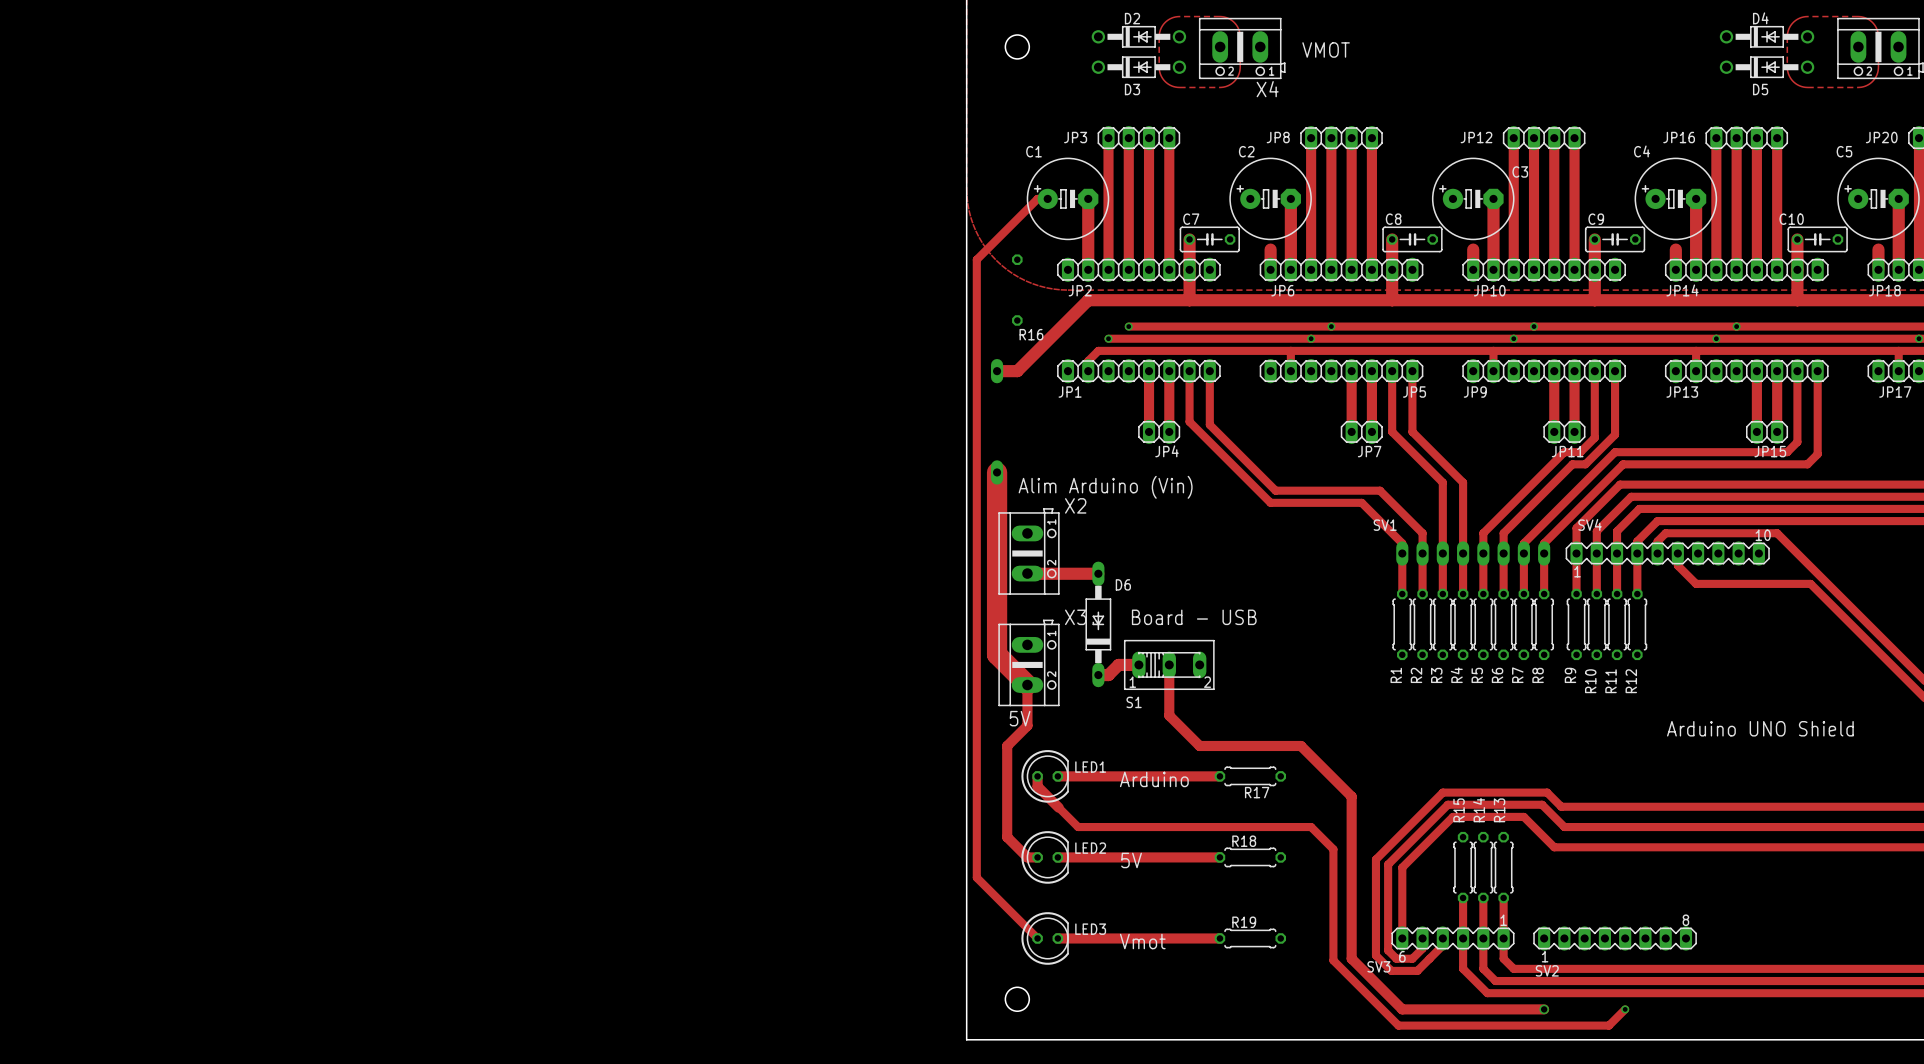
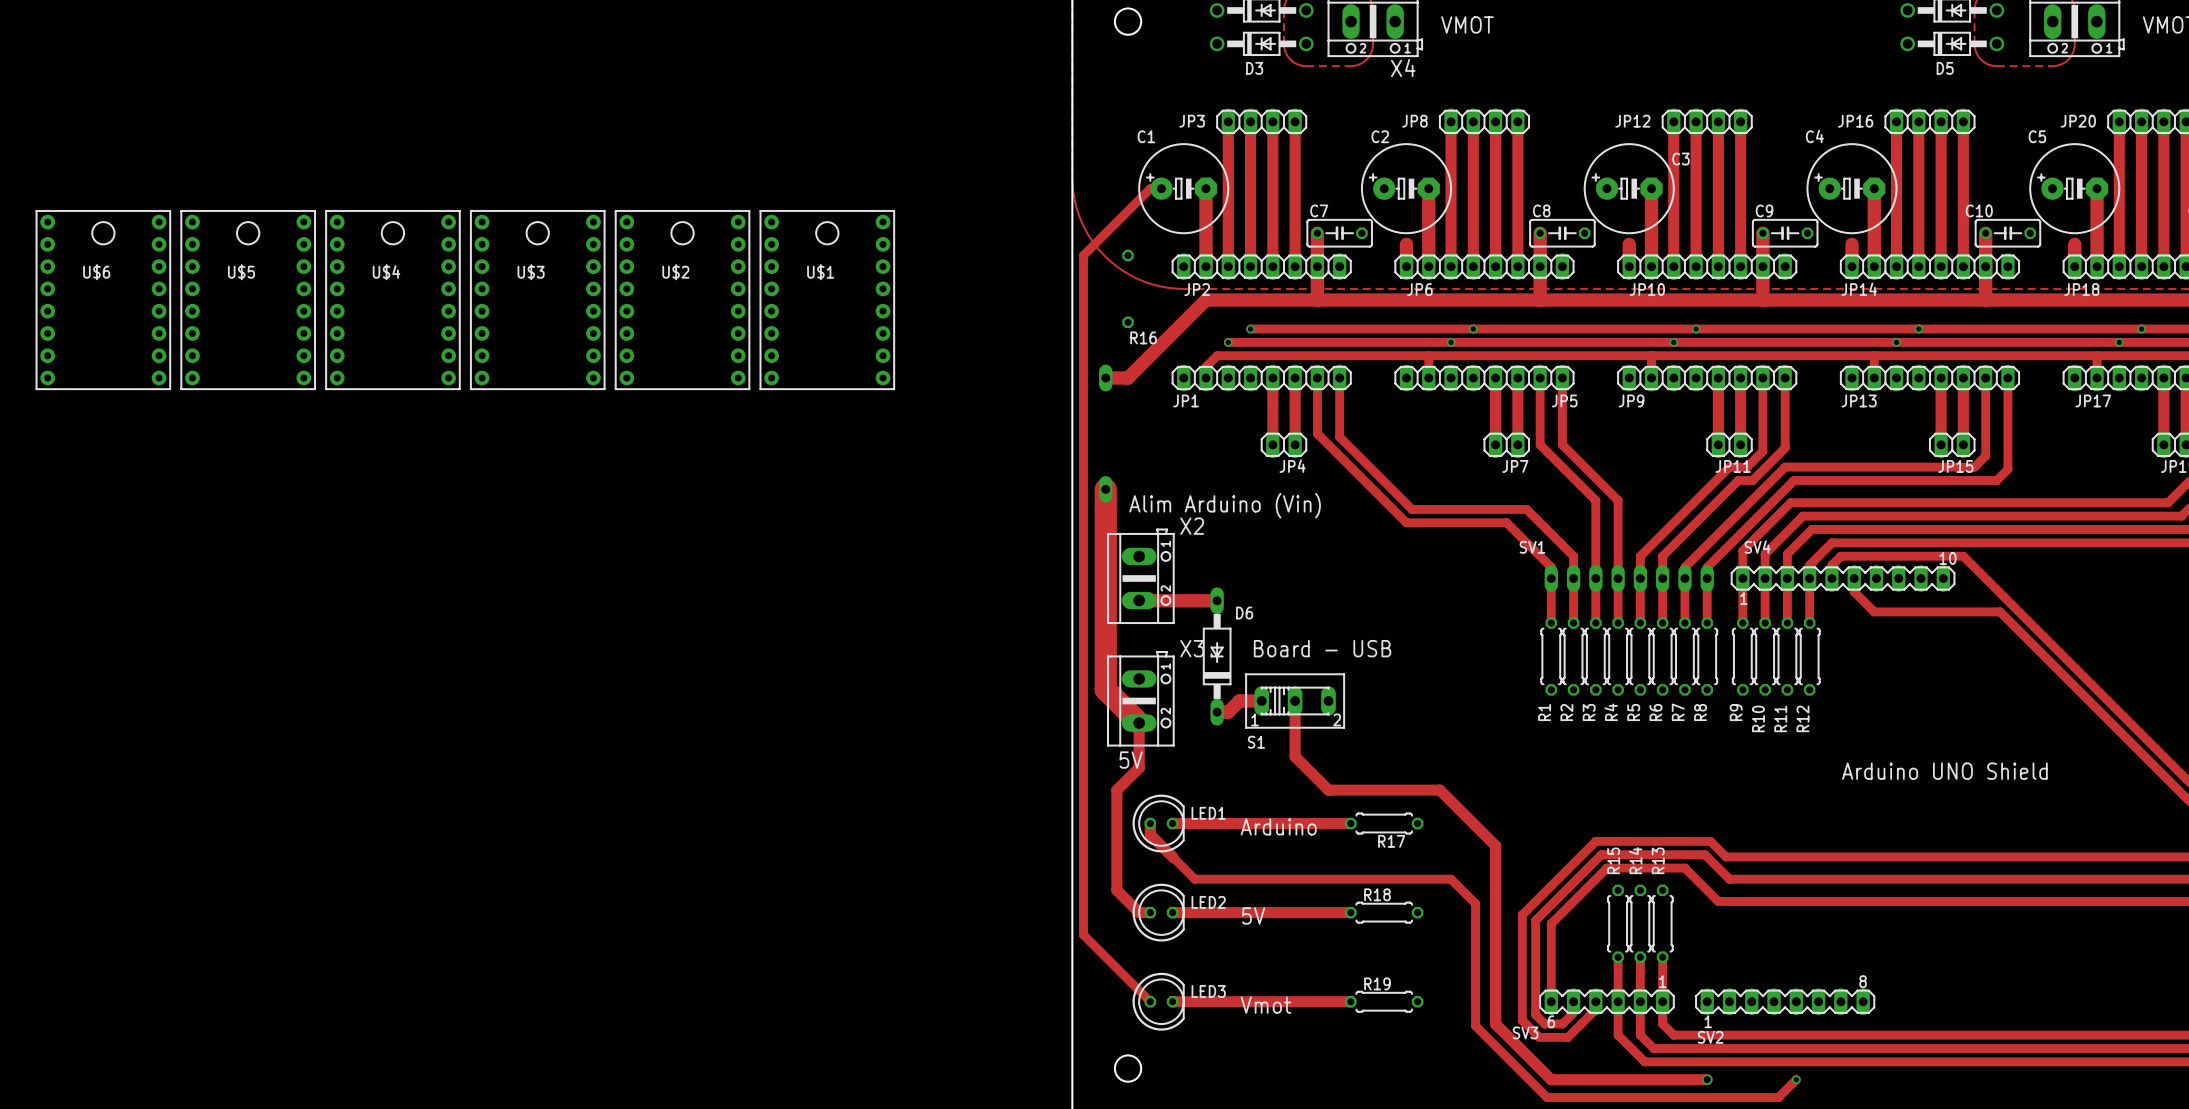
U$6: none -> (103, 300)
U$5: none -> (248, 300)
U$4: none -> (392, 300)
U$3: none -> (537, 300)
U$2: none -> (682, 300)
U$1: none -> (827, 300)

